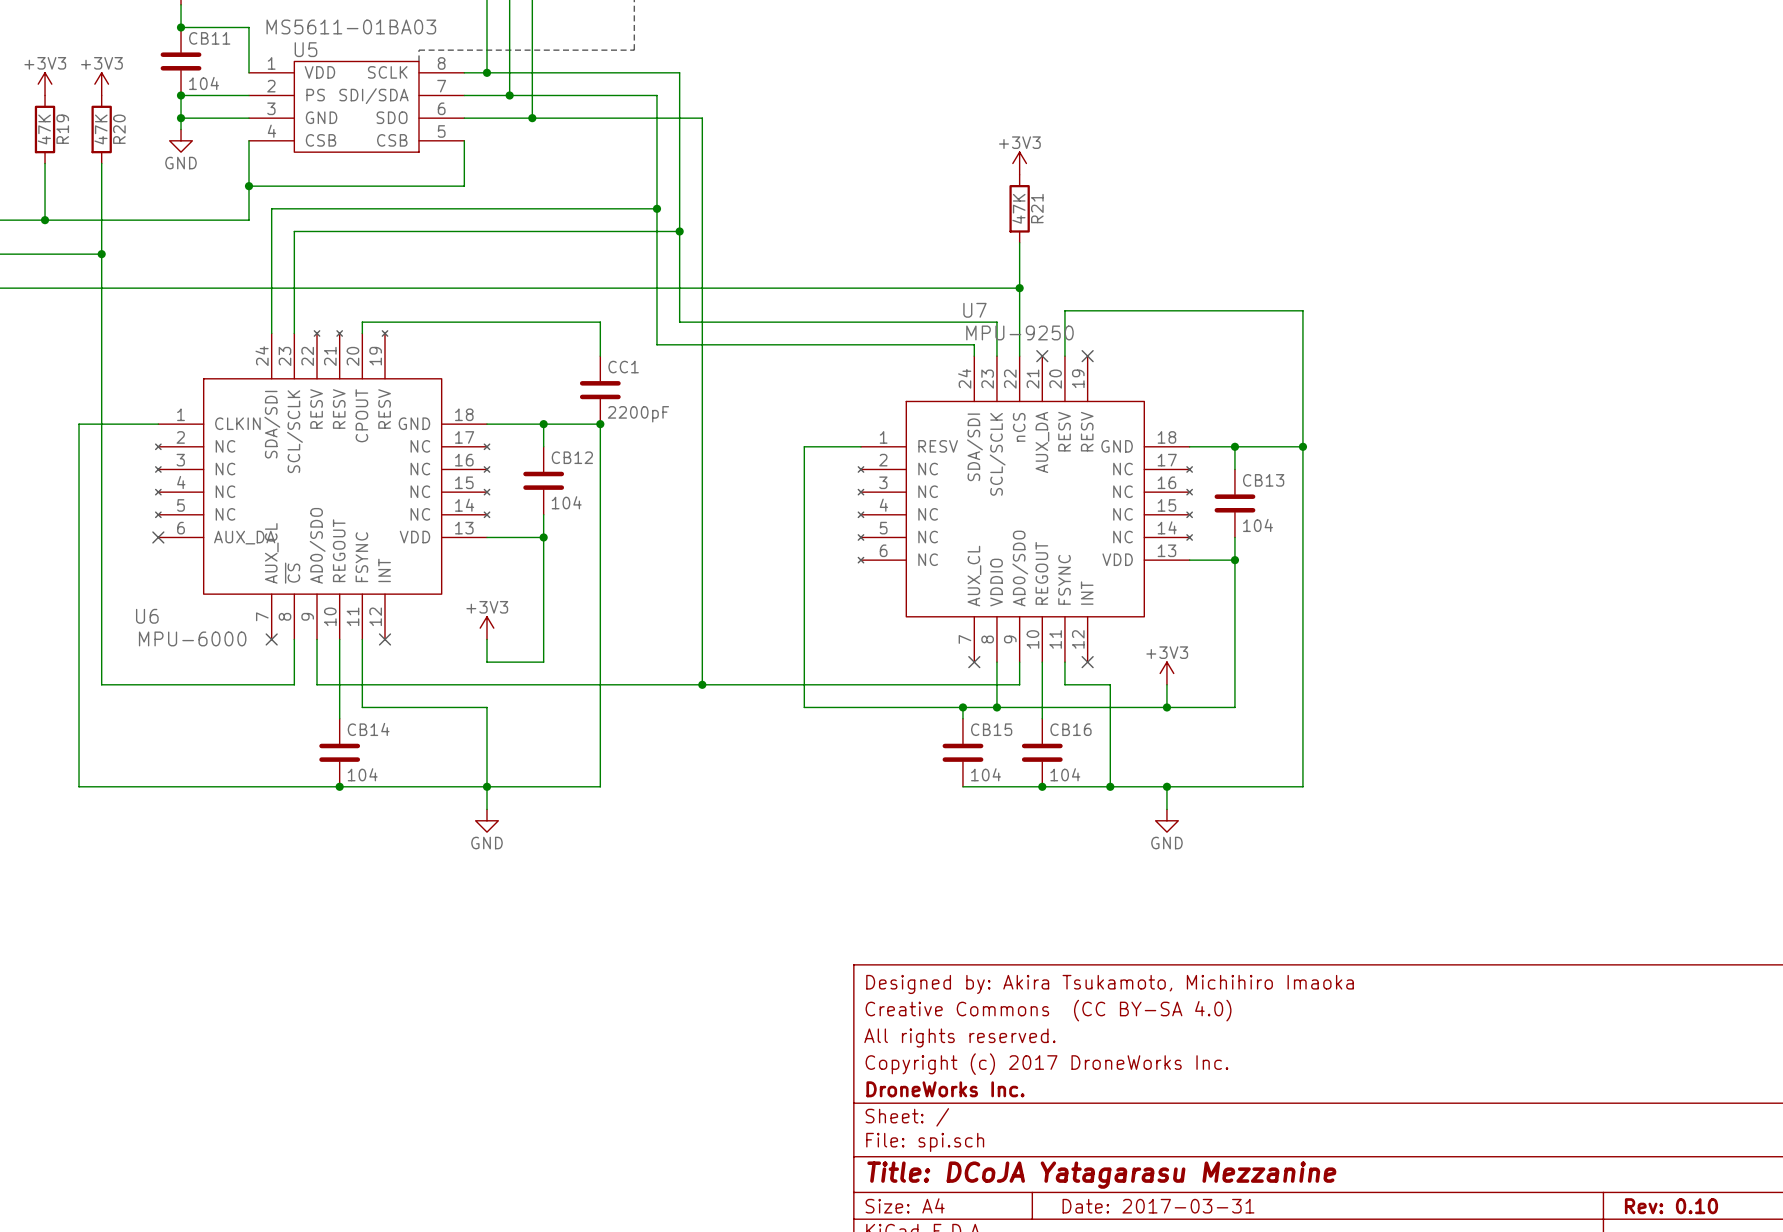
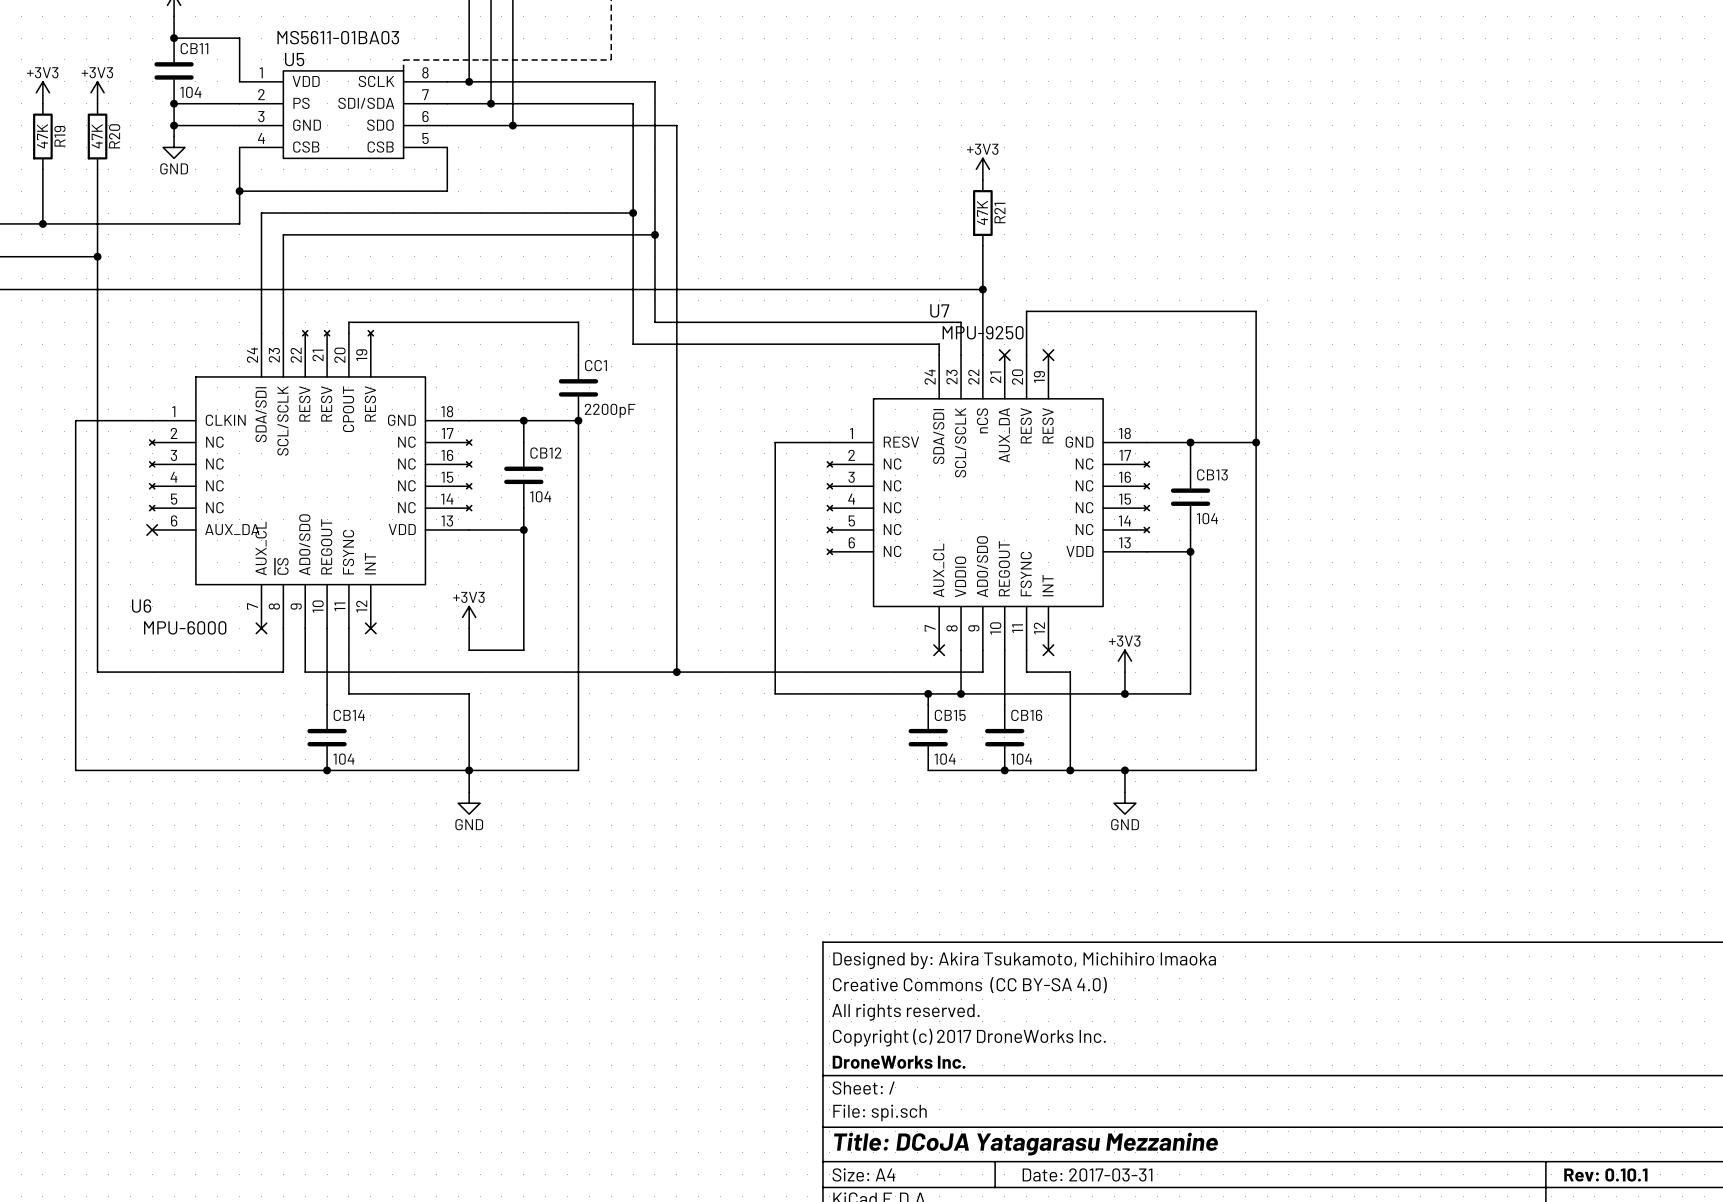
title block: Rev: 0.10 (1671, 1206) -> Rev: 0.10.1 (1605, 1174)

